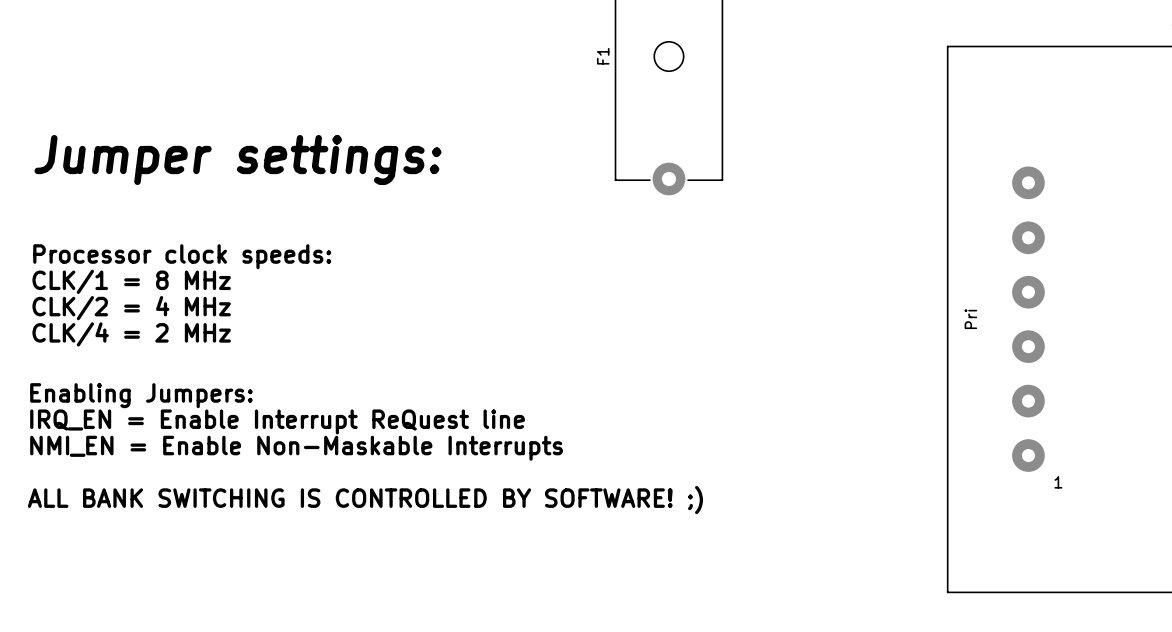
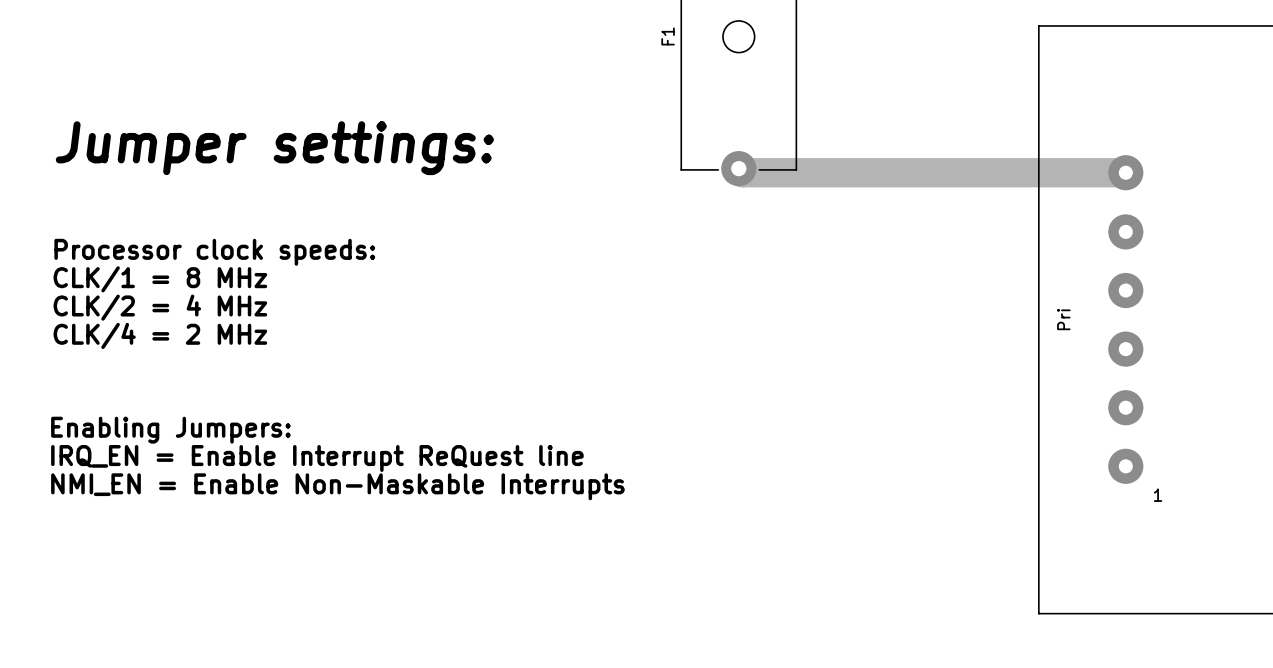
track: none -> (738, 168) (742, 172) (1125, 172)
text: Enabling Jumpers: (141, 395) -> none
text: IRQ_EN = Enable Interrupt ReQuest line (277, 421) -> Enabling Jumpers: (170, 430)
text: NMI_EN = Enable Non-Maskable Interrupts (296, 448) -> IRQ_EN = Enable Interrupt ReQuest line (317, 458)
text: none -> NMI_EN = Enable Non-Maskable Interrupts (337, 486)
text: ALL BANK SWITCHING IS CONTROLLED BY SOFTWARE! ;) (365, 500) -> none

